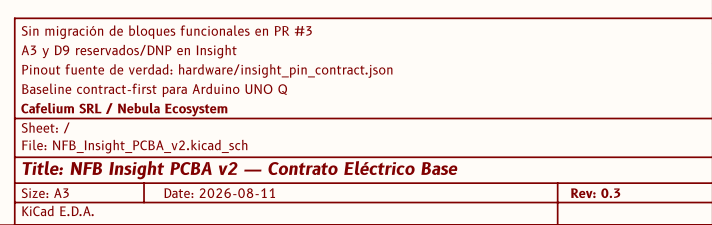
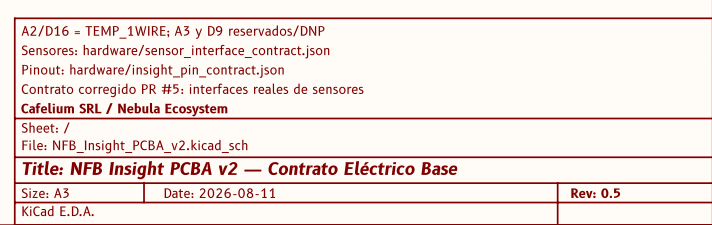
title block: Sin migración de bloques funcionales en PR #3 (166, 32) -> A2/D16 = TEMP_1WIRE; A3 y D9 reservados/DNP (173, 32)
title block: A3 y D9 reservados/DNP en Insight (129, 51) -> Sensores: hardware/sensor_interface_contract.json (175, 51)
title block: Pinout fuente de verdad: hardware/insight_pin_contract.json (207, 71) -> Pinout: hardware/insight_pin_contract.json (152, 71)
title block: Baseline contract-first para Arduino UNO Q (154, 90) -> Contrato corregido PR #5: interfaces reales de sensores (192, 90)
title block: Rev: 0.3 (595, 193) -> Rev: 0.5 (595, 193)

